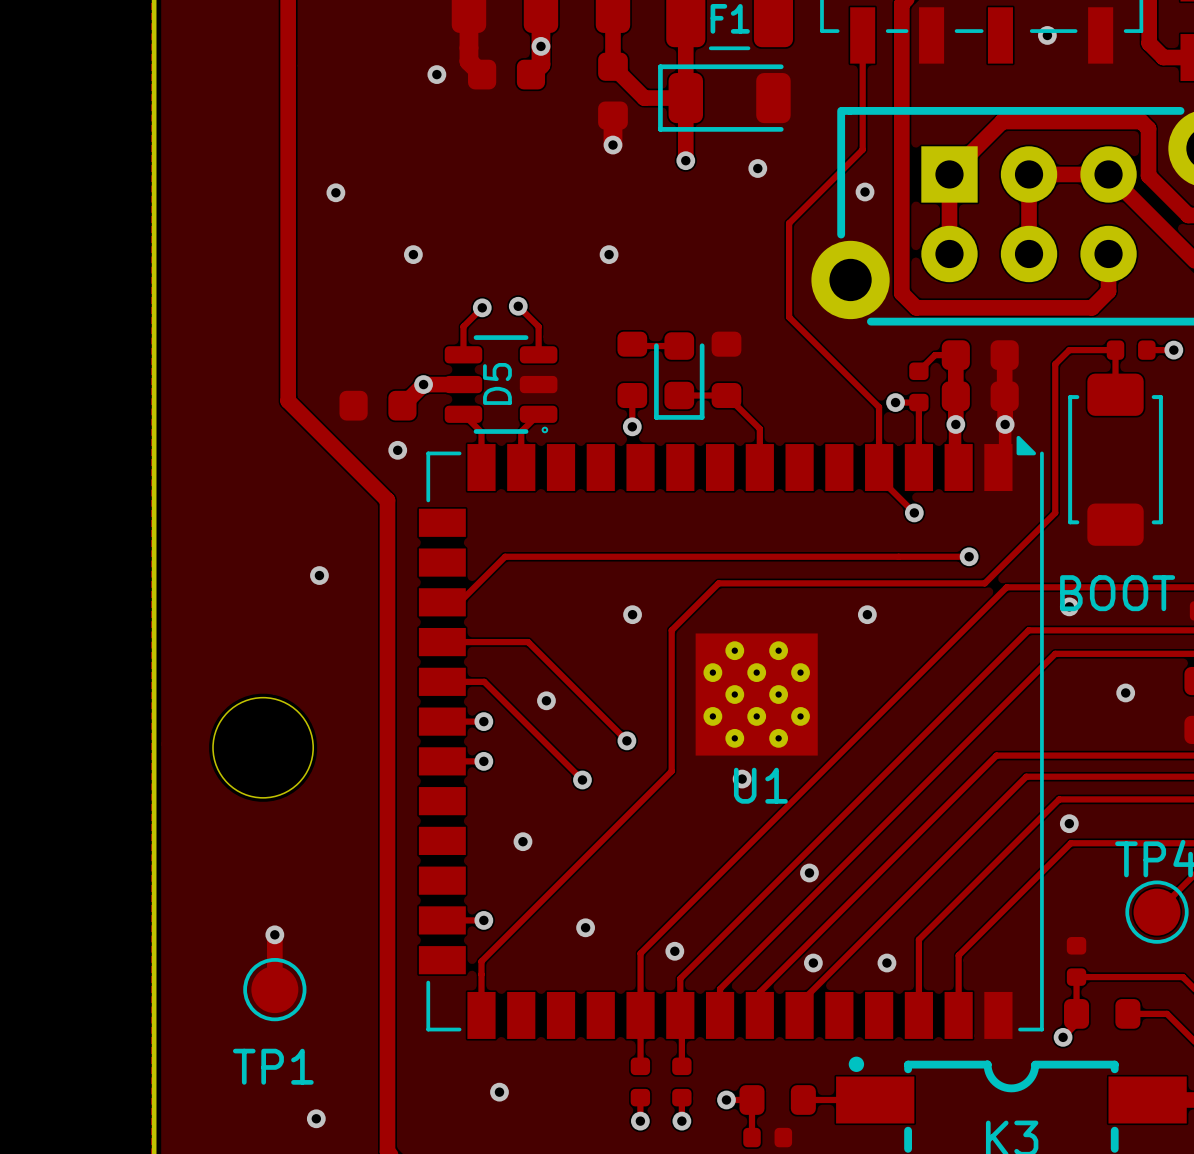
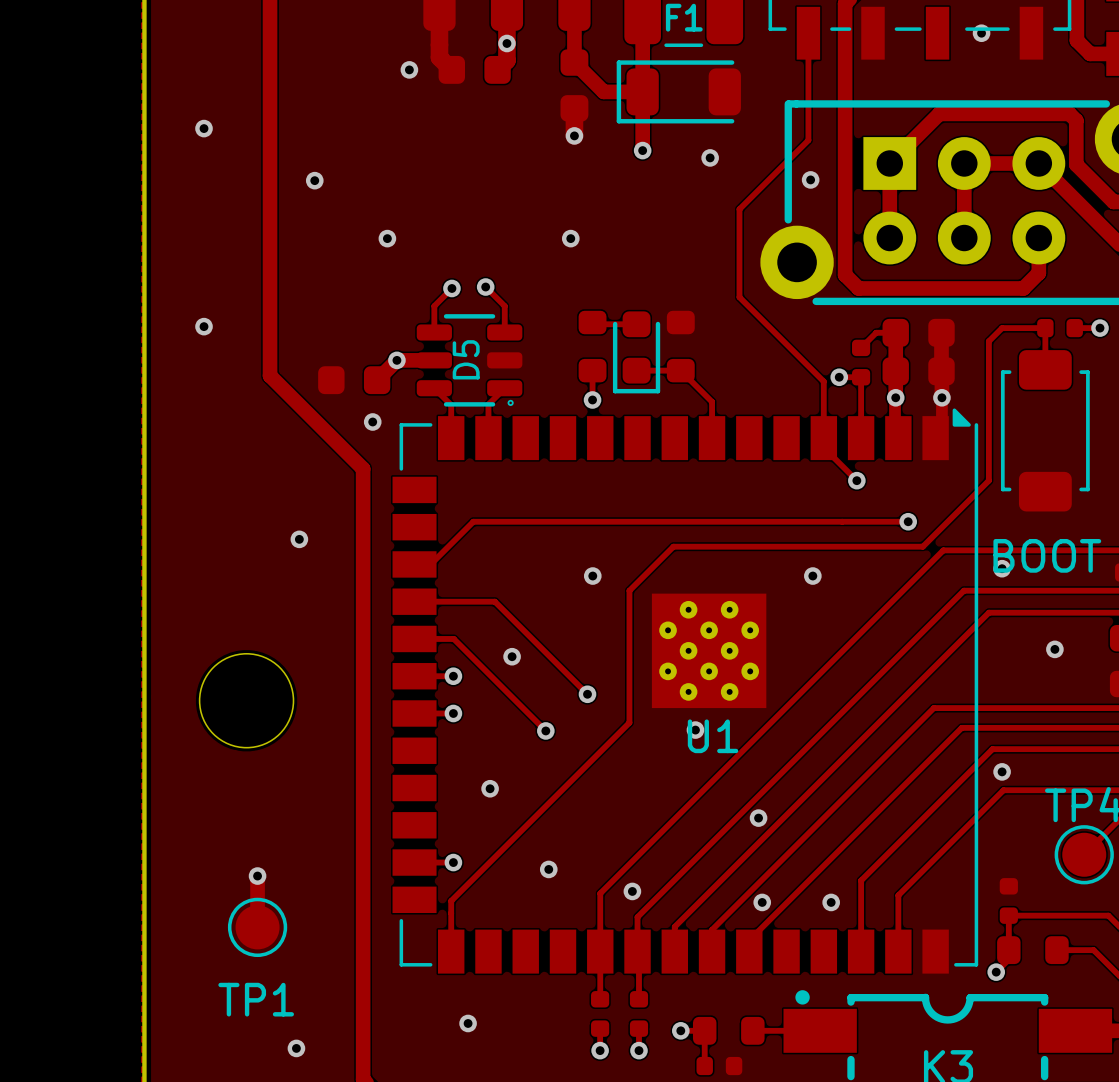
via: none -> (204, 128)
via: none -> (204, 326)

